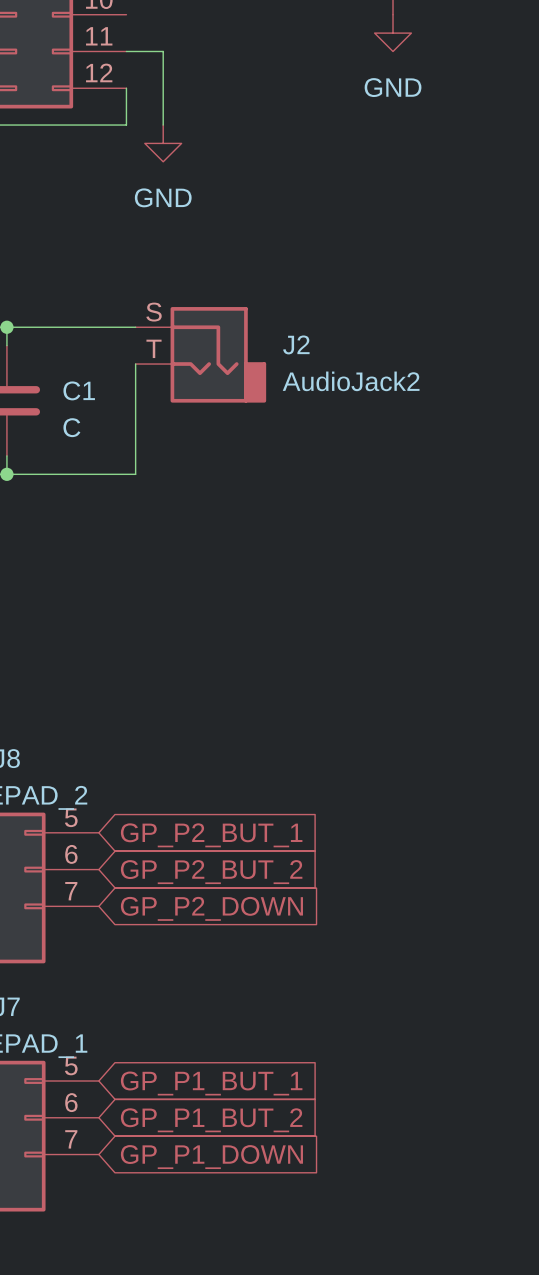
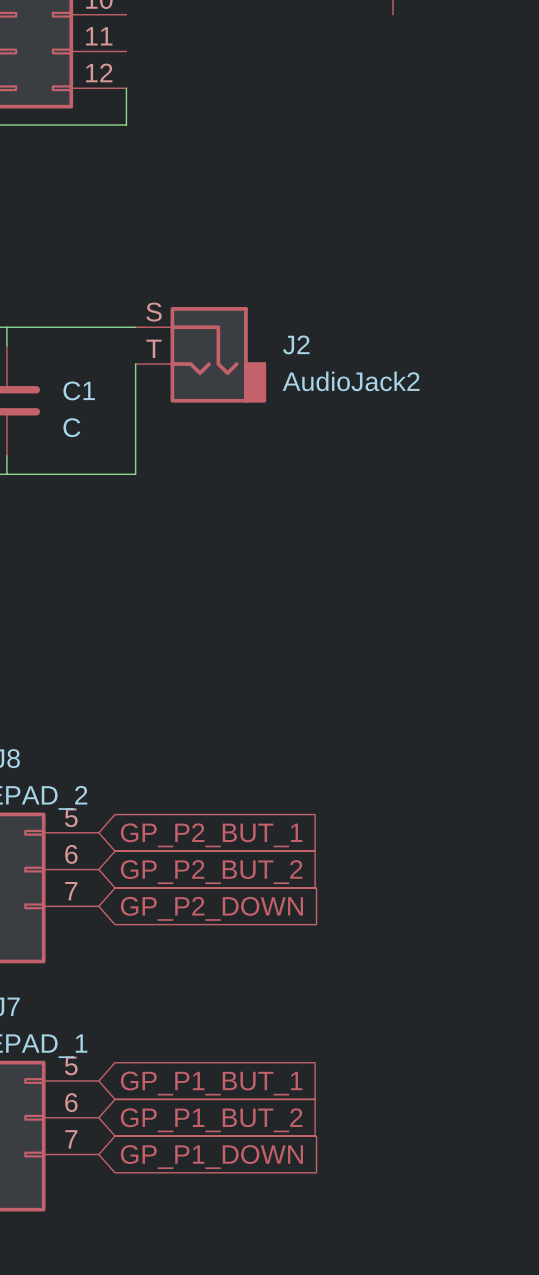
power symbol: GND (393, 33) -> none
wire: (126, 51) (163, 51) (163, 125) -> none
power symbol: GND (163, 143) -> none
junction: (6, 327) -> none
junction: (6, 474) -> none

